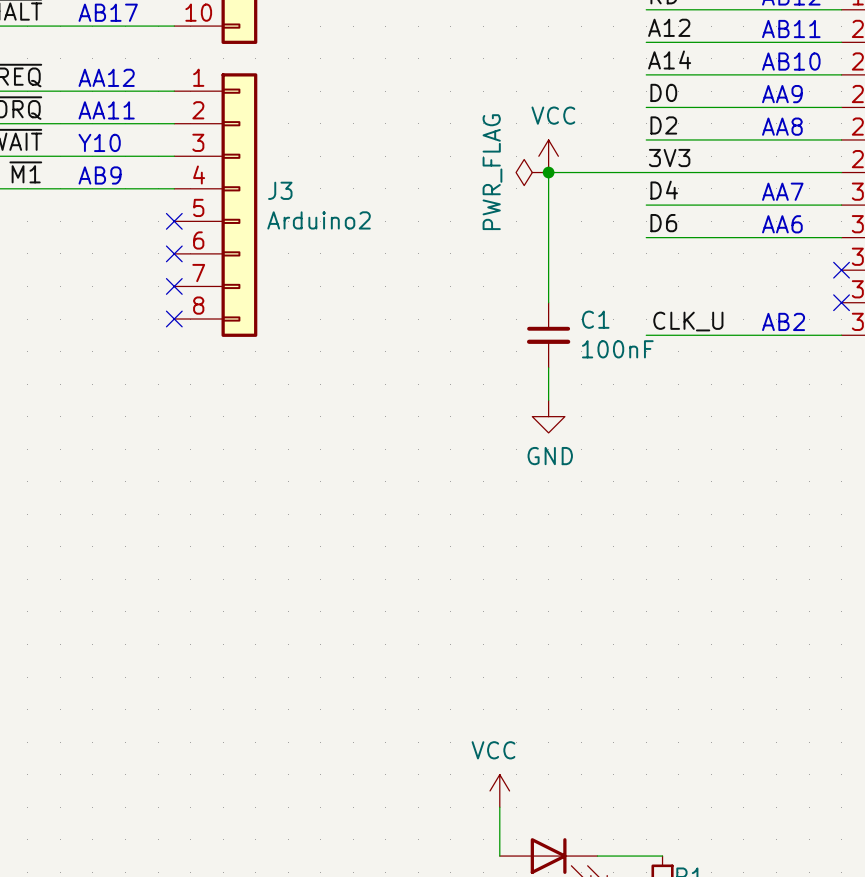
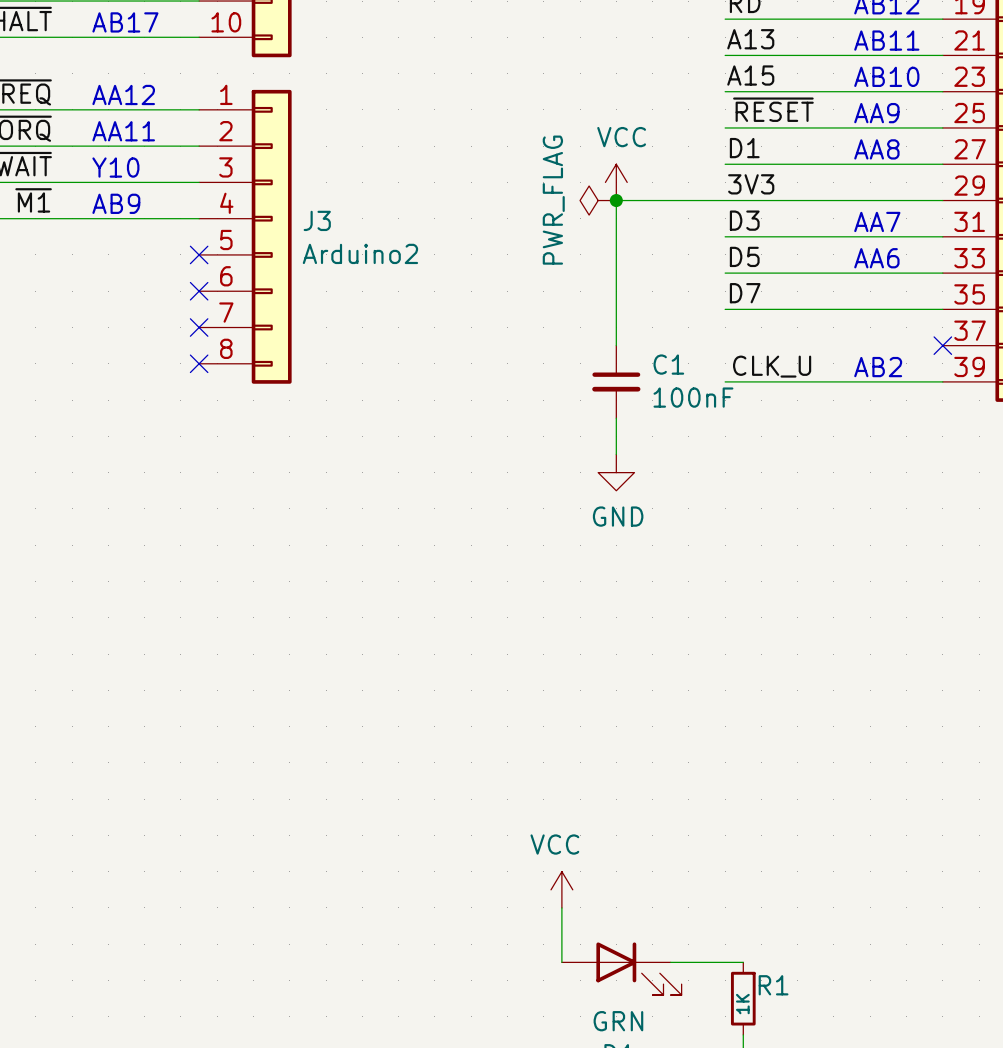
label: A12 (669, 27) -> A13 (750, 39)
label: A14 (669, 59) -> A15 (750, 75)
label: none -> ~{RESET} (773, 109)
label: D0 (663, 92) -> none
label: D2 (663, 125) -> D1 (744, 148)
label: D4 (664, 190) -> D3 (744, 220)
label: D6 (663, 223) -> D5 (744, 256)
label: none -> D7 (745, 293)
wire: none -> (725, 309) (942, 309)
no-connect mark: (841, 270) -> none

